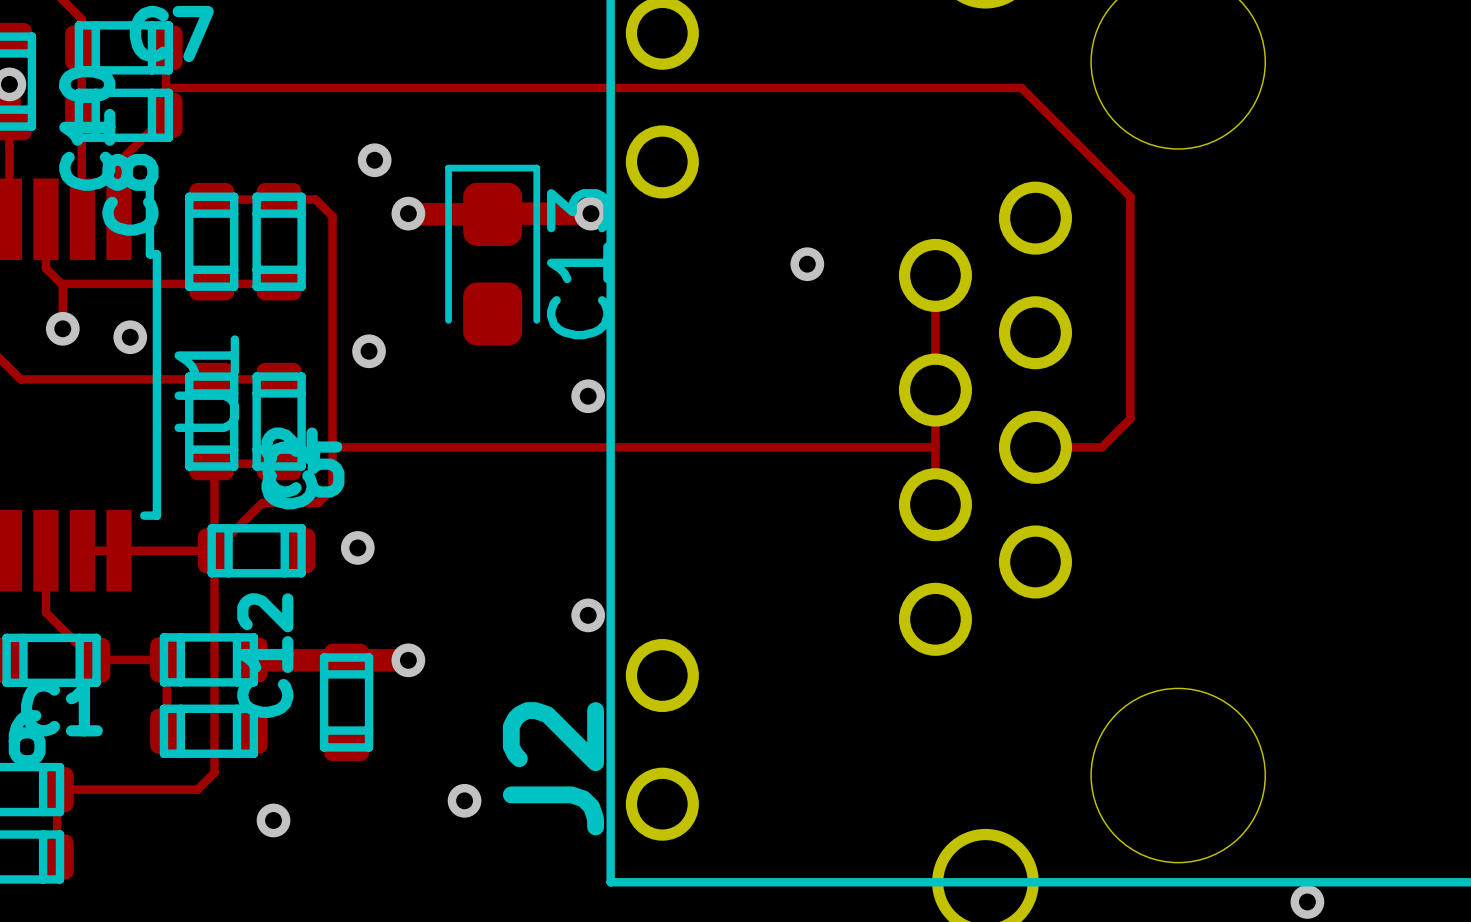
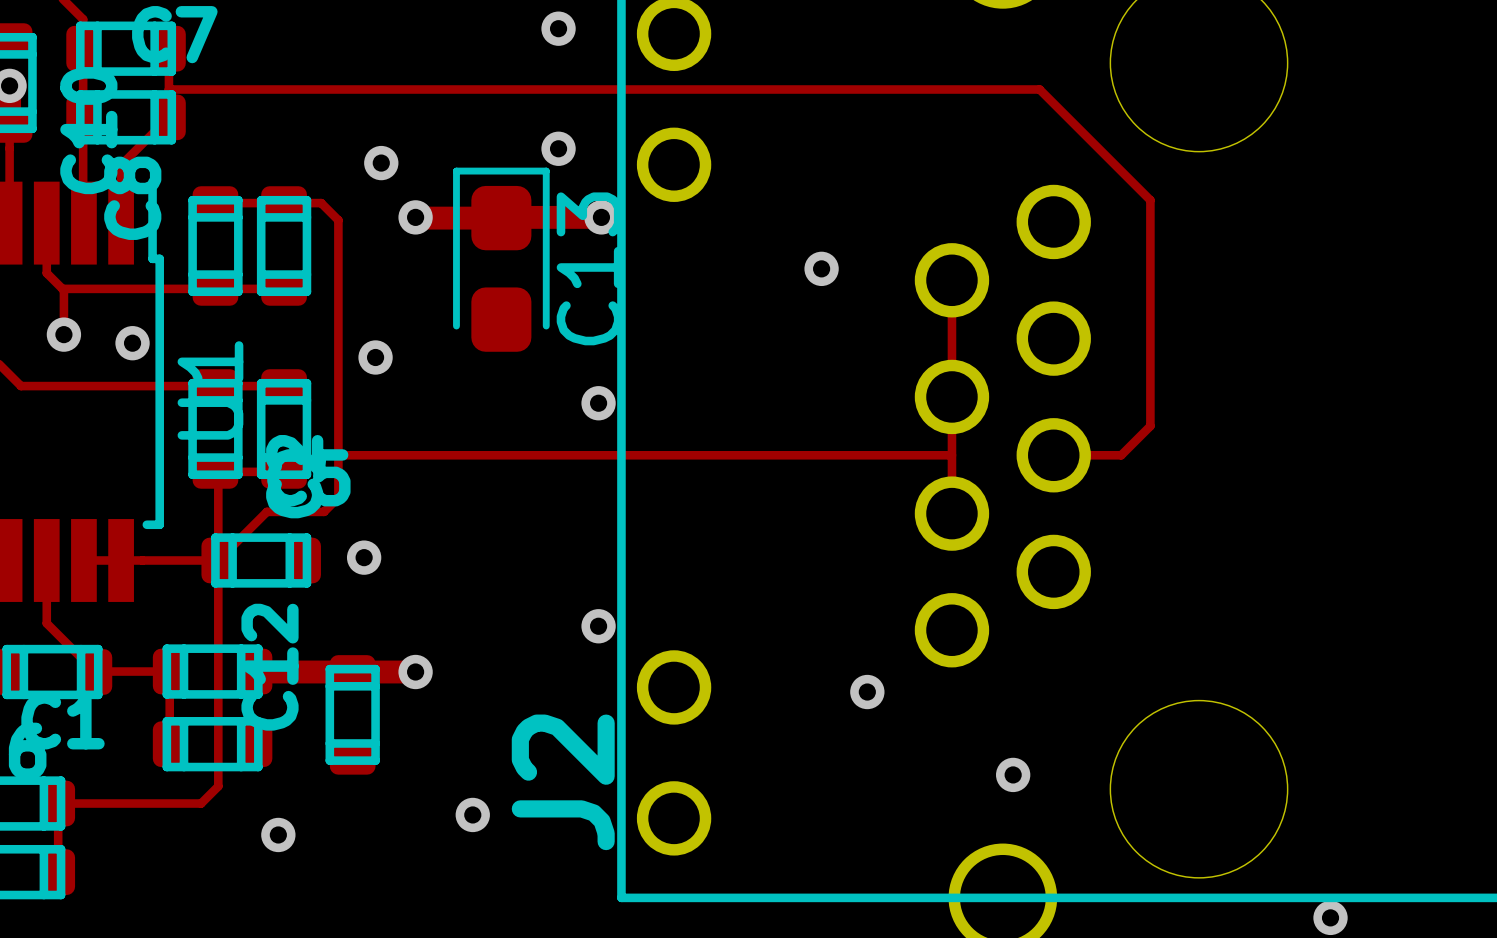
via: none -> (558, 28)
via: none -> (558, 148)
via: none -> (867, 692)
via: none -> (1013, 774)

